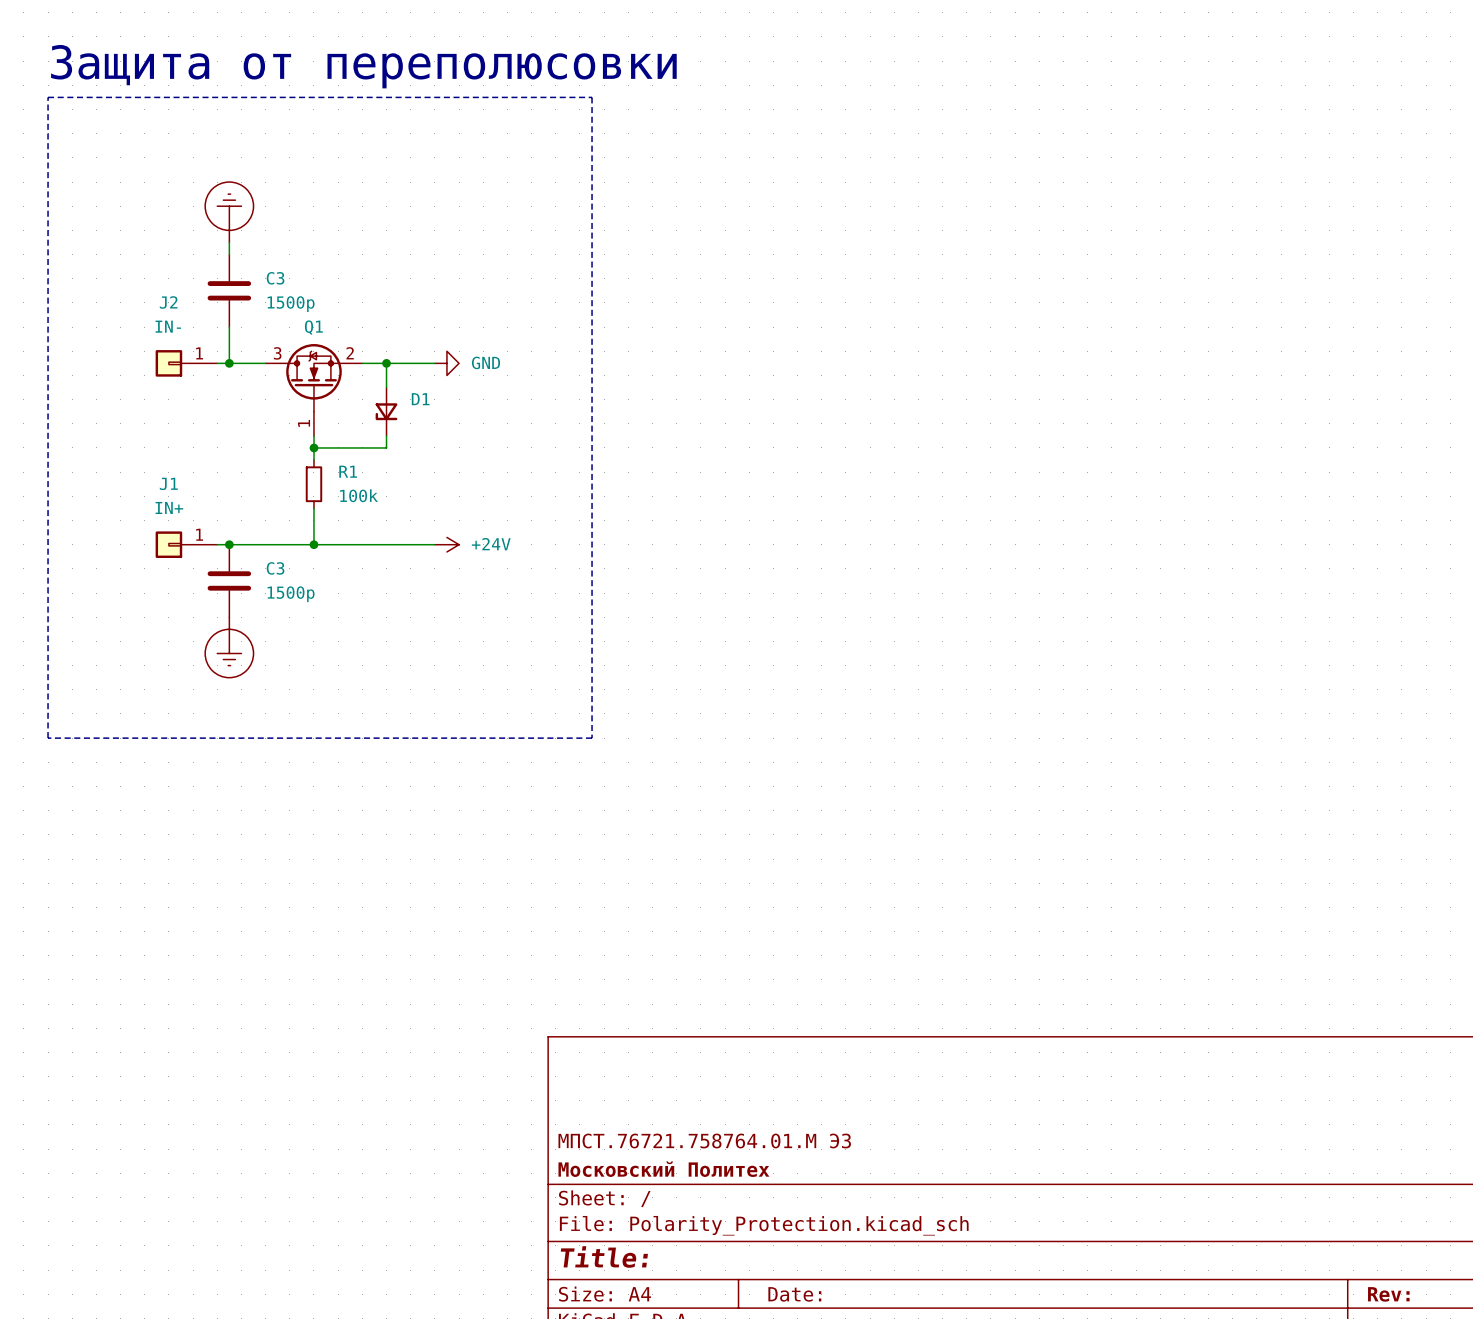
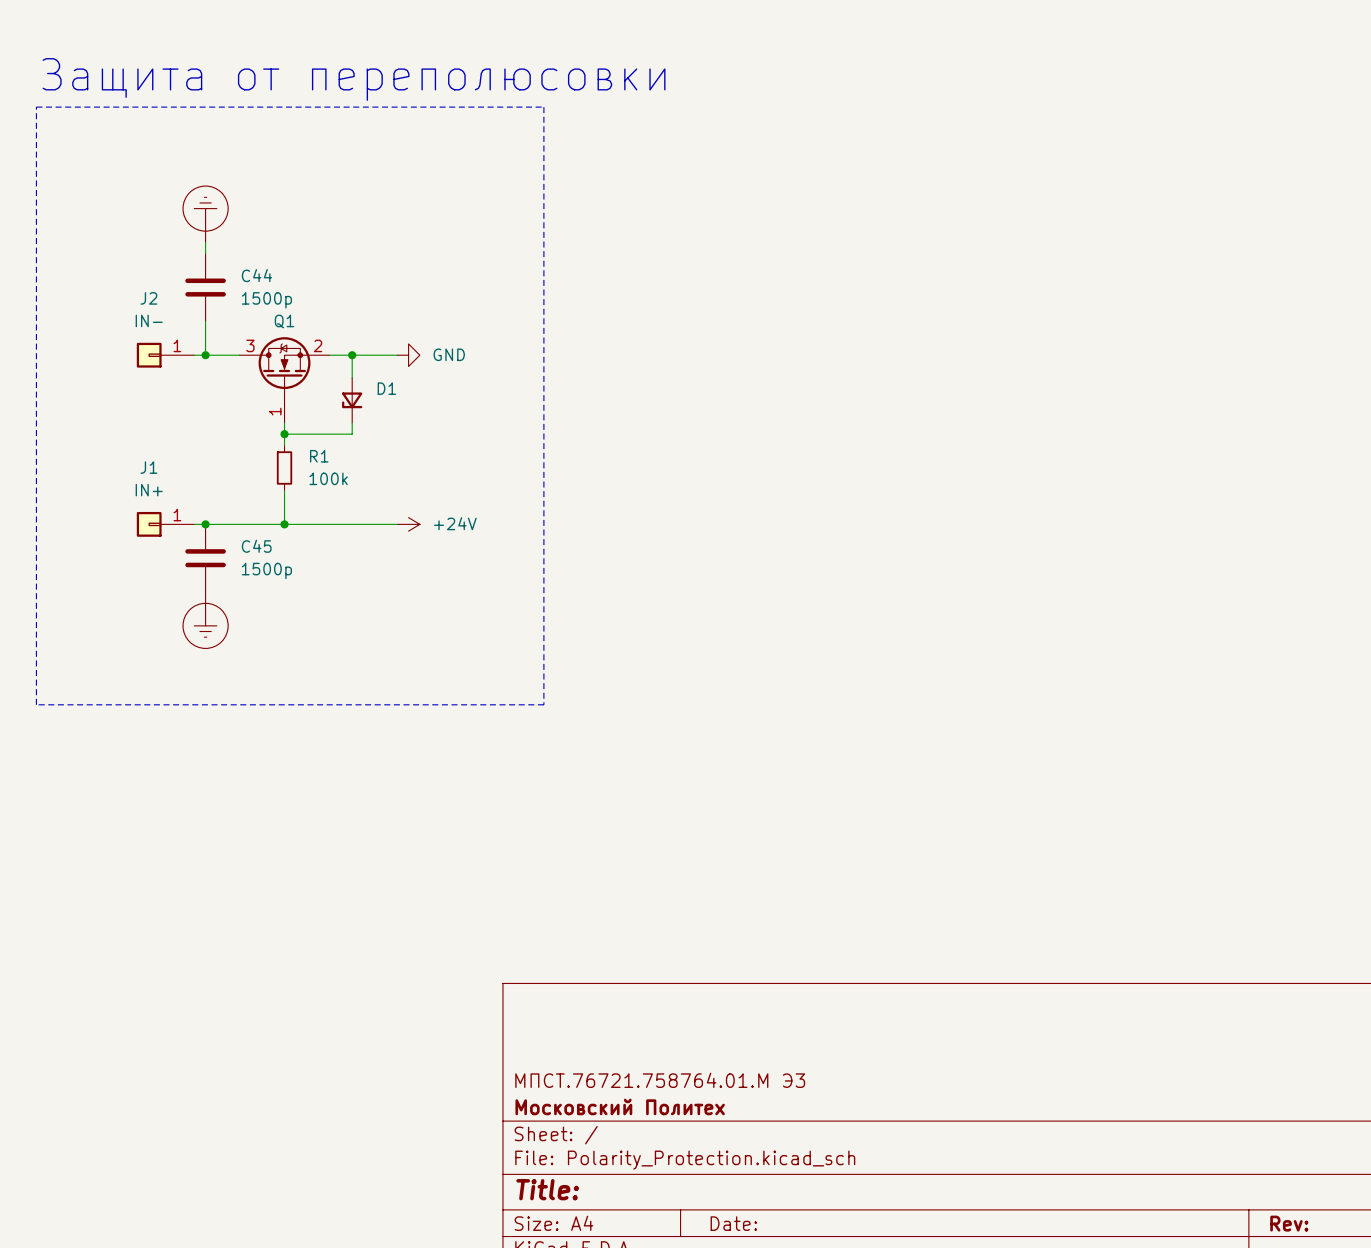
C3 name: C3 (275, 278) -> C44 (256, 275)
C3 name: C3 (275, 568) -> C45 (256, 546)

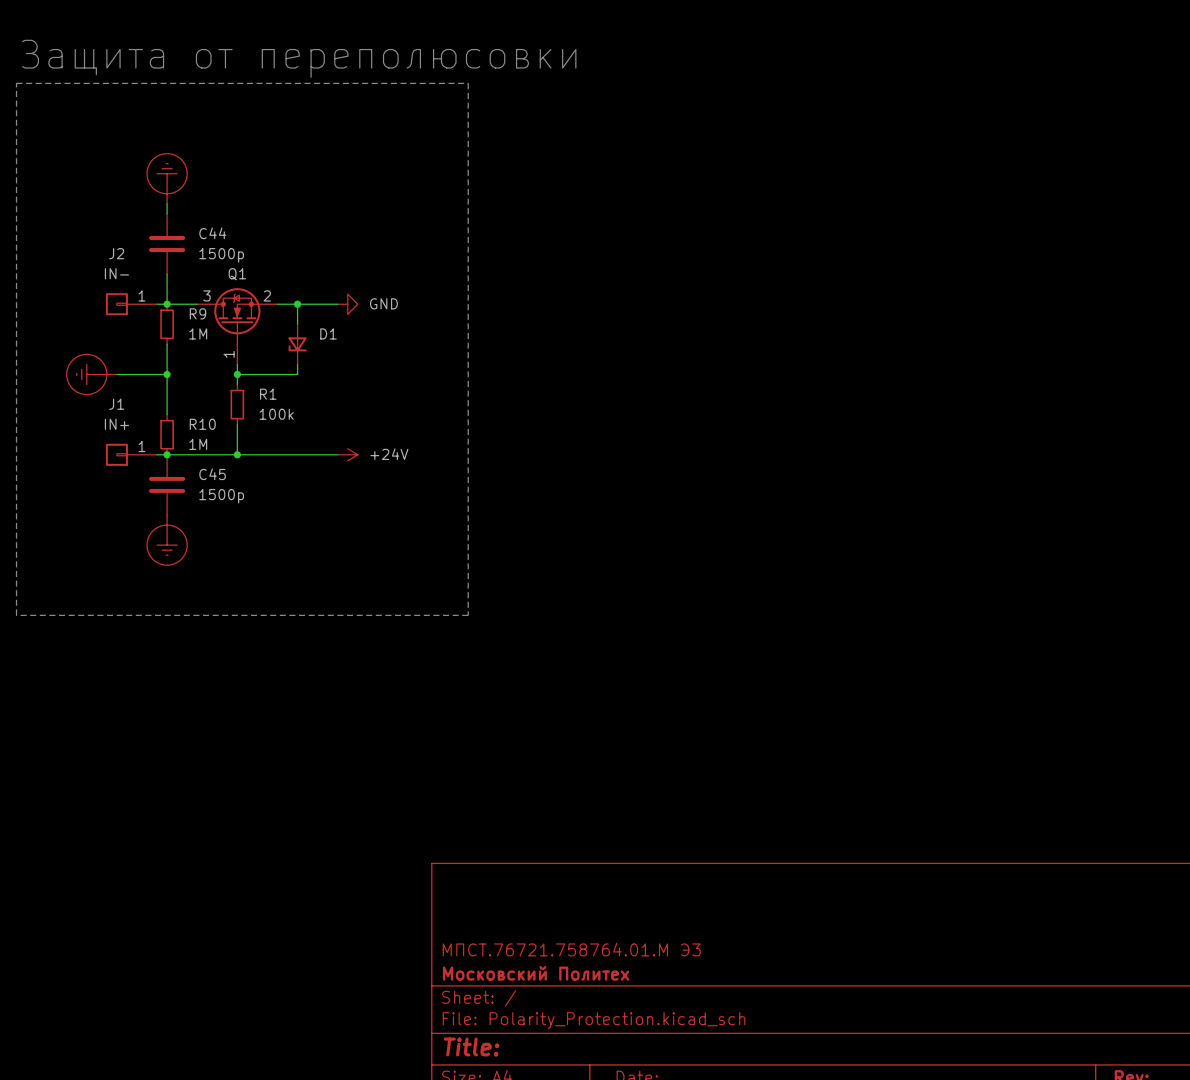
R9: none -> 1M (167, 324)
wire: none -> (167, 344) (167, 414)
power symbol: none -> (91, 374)
wire: none -> (116, 374) (167, 374)
junction: none -> (167, 374)
R10: none -> 1M (167, 434)

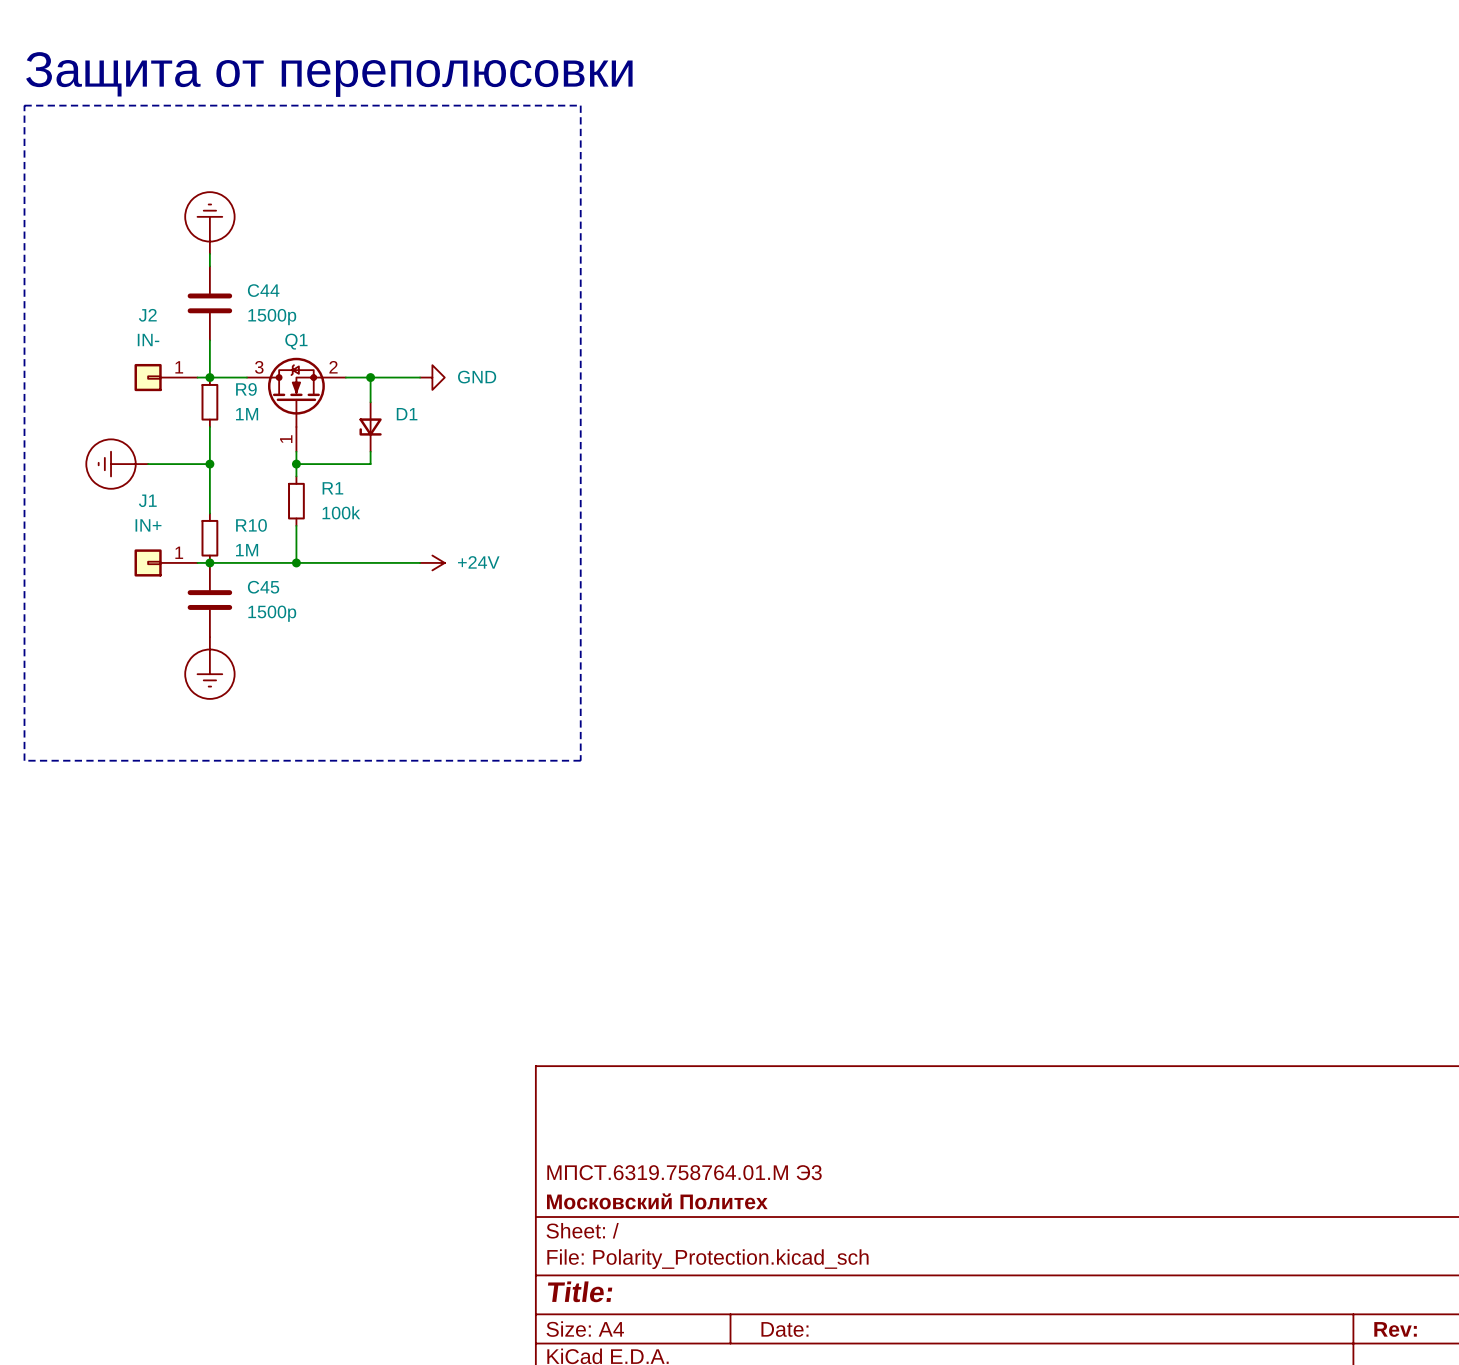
title block: МПСТ.76721.758764.01.М Э3 (571, 949) -> МПСТ.6319.758764.01.М Э3 (684, 1172)

